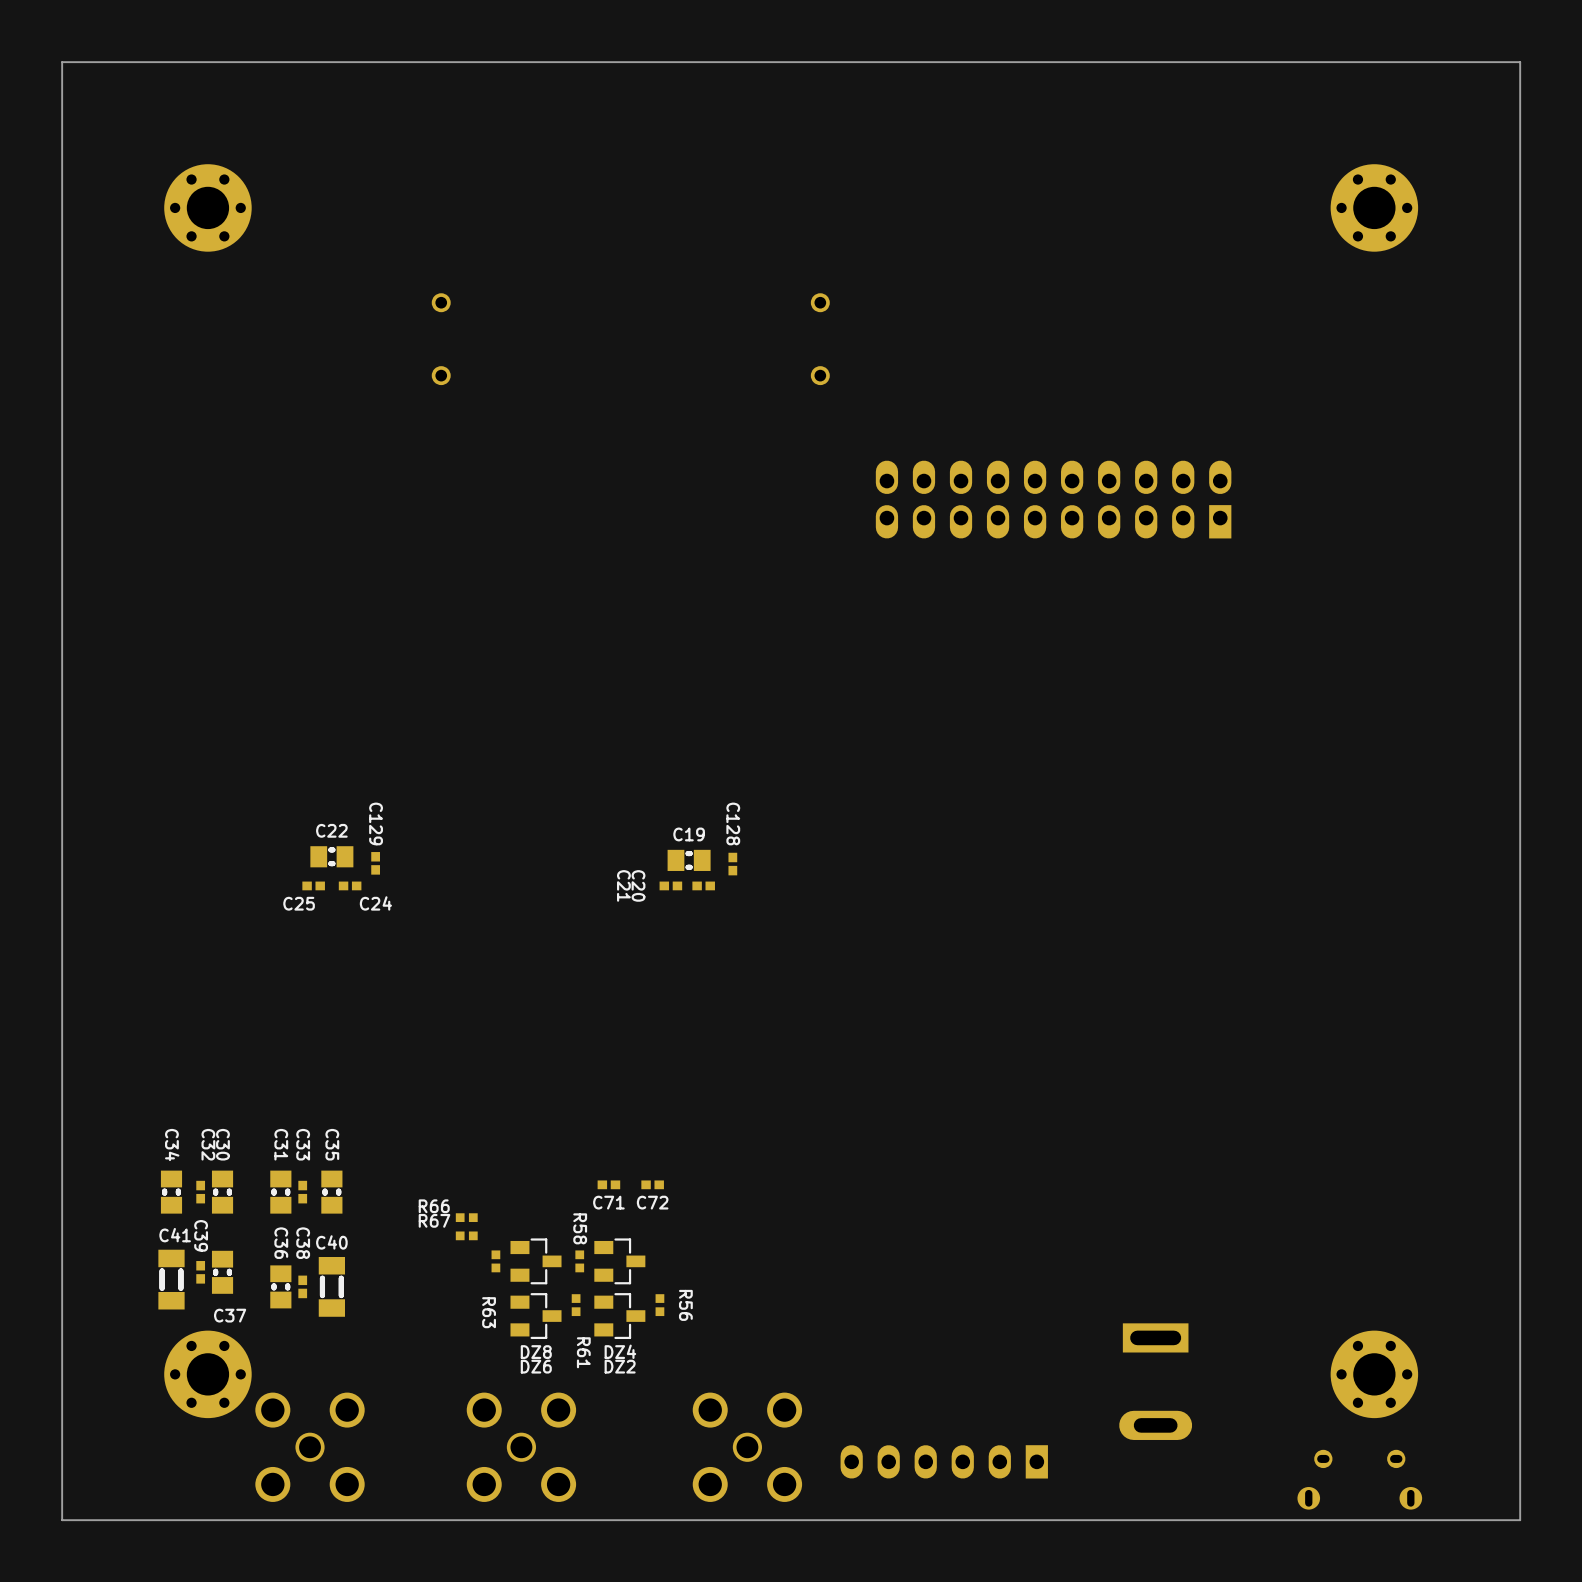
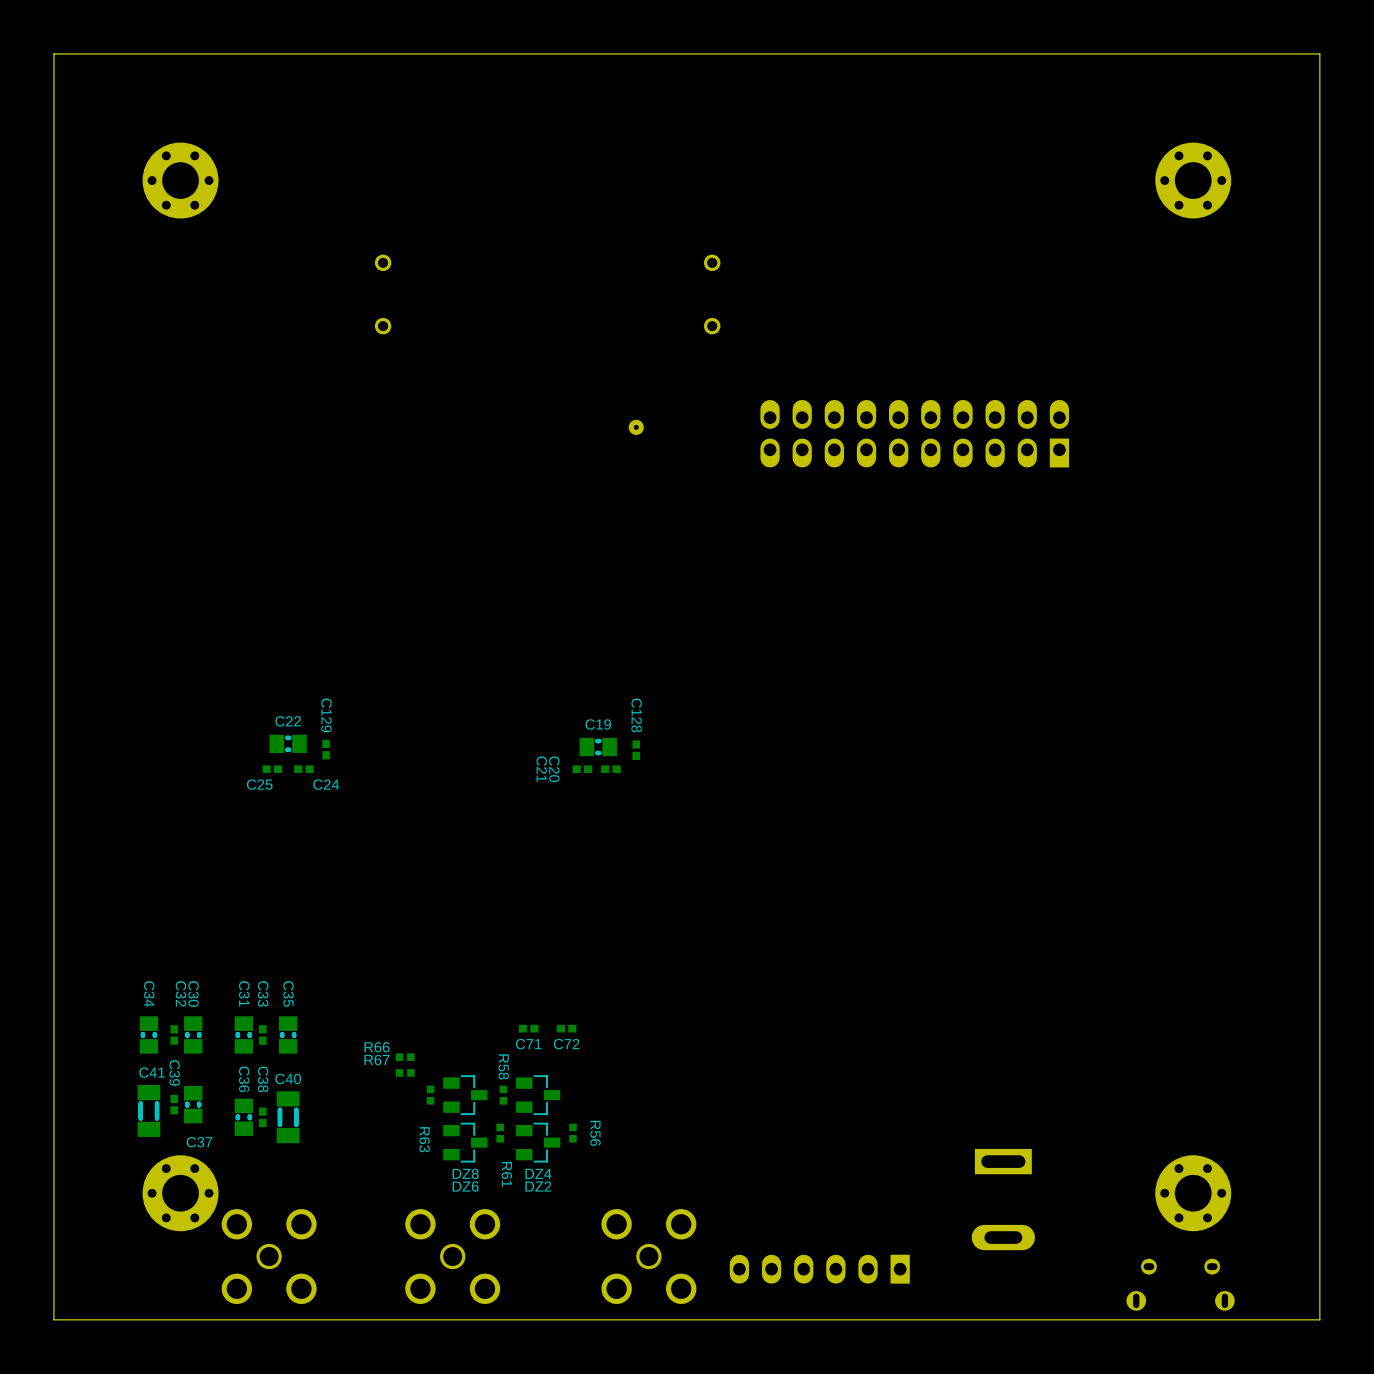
part: none -> (636, 427)

